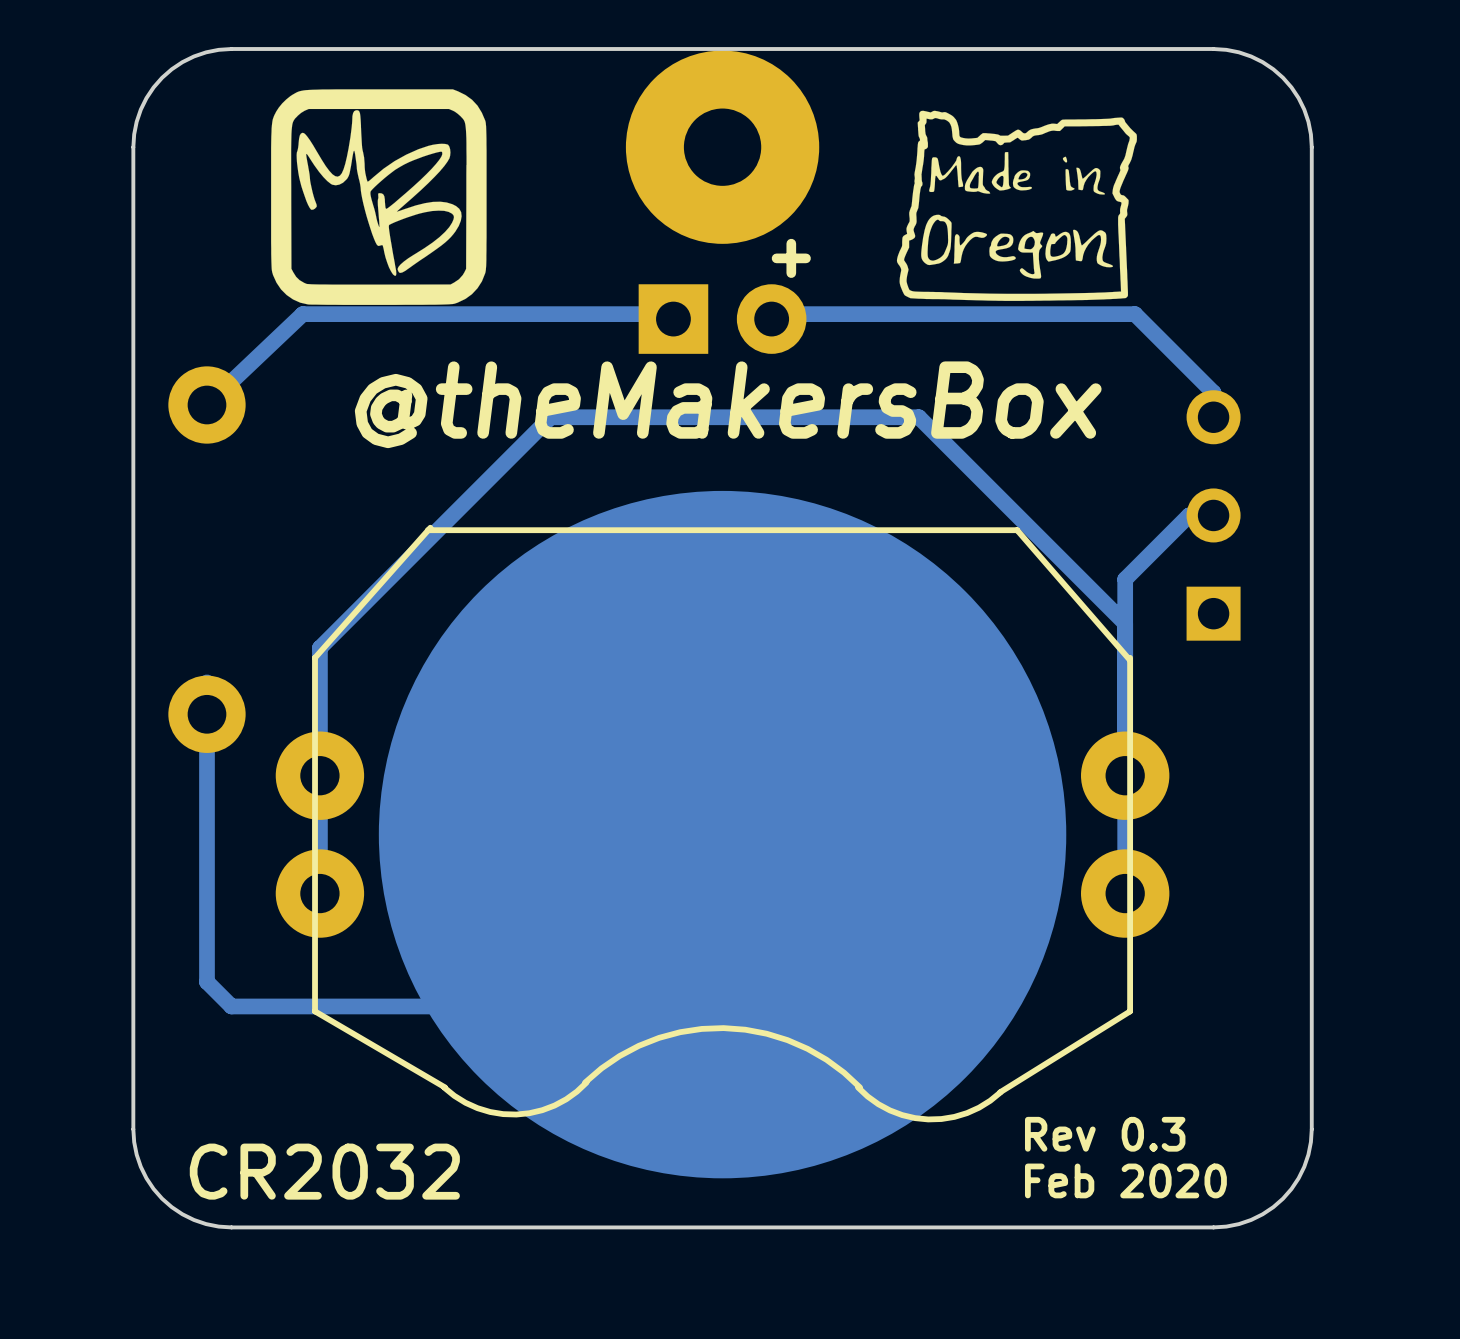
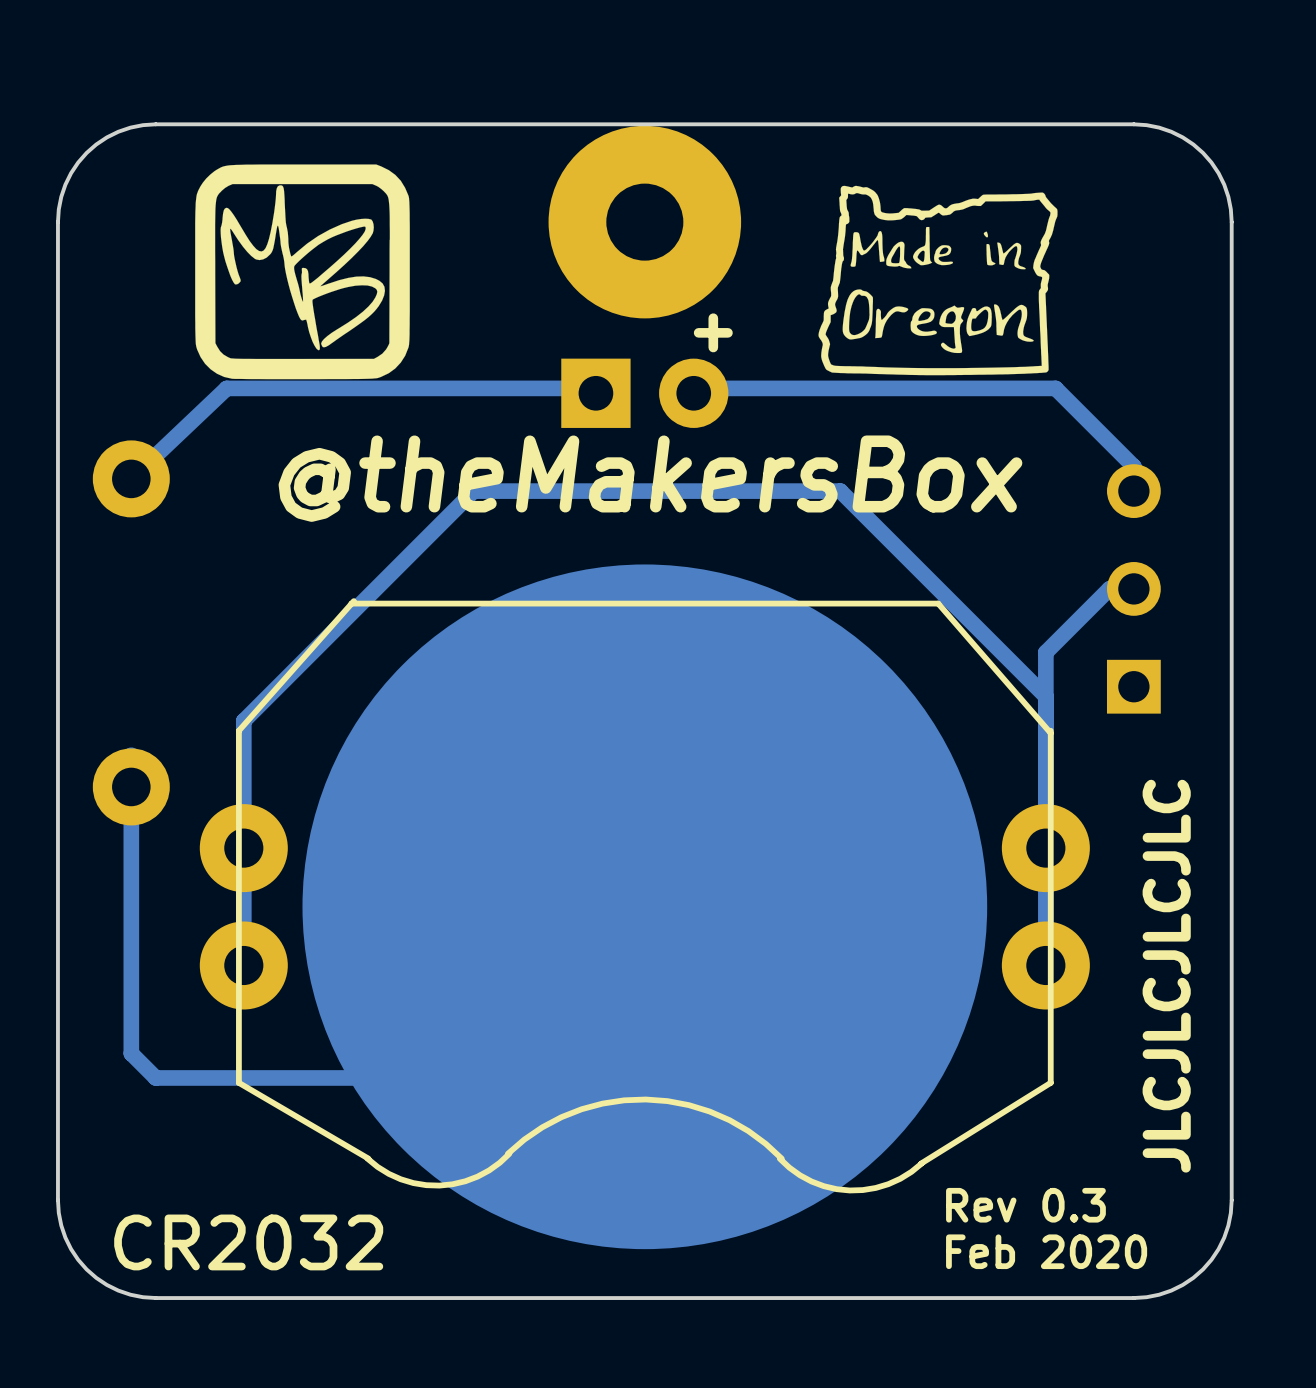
text: none -> JLCJLCJLCJLC (1166, 976)

